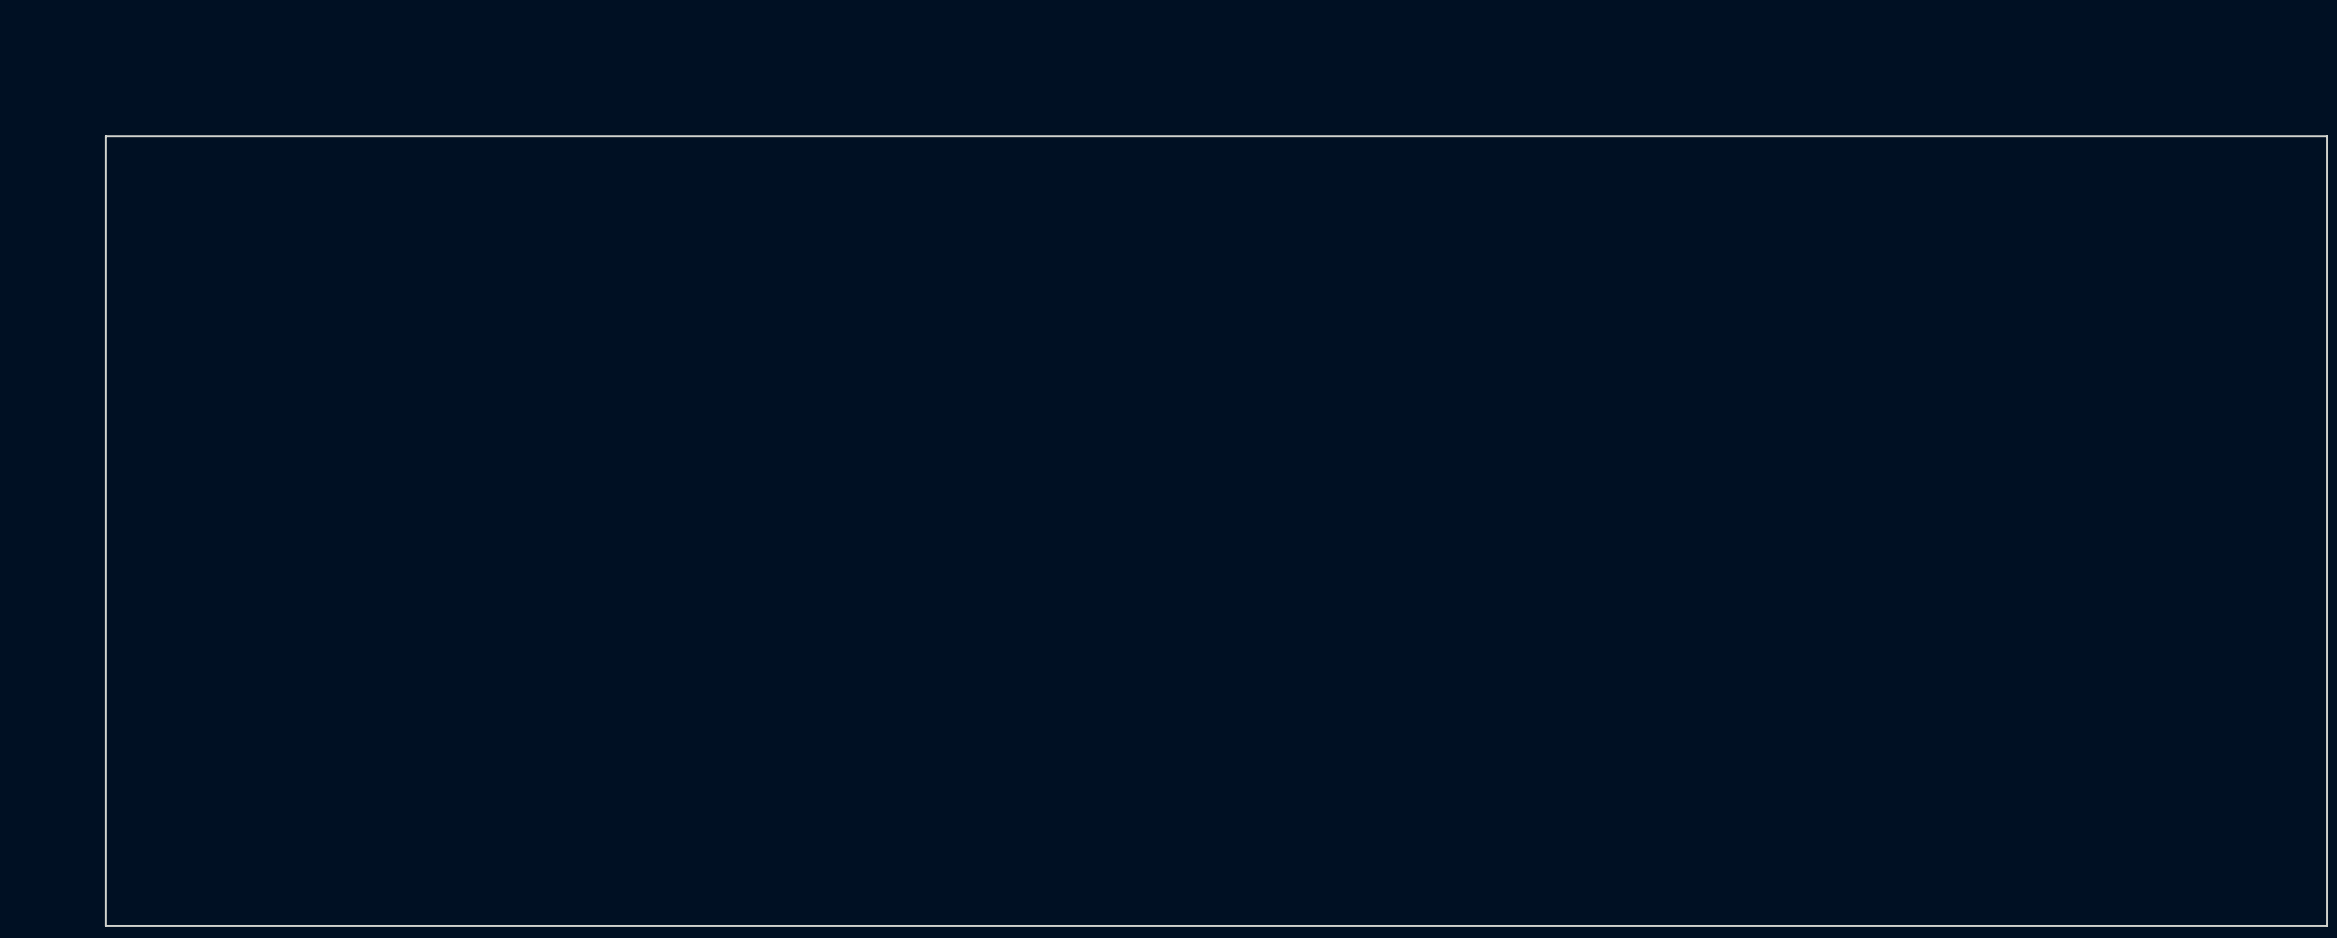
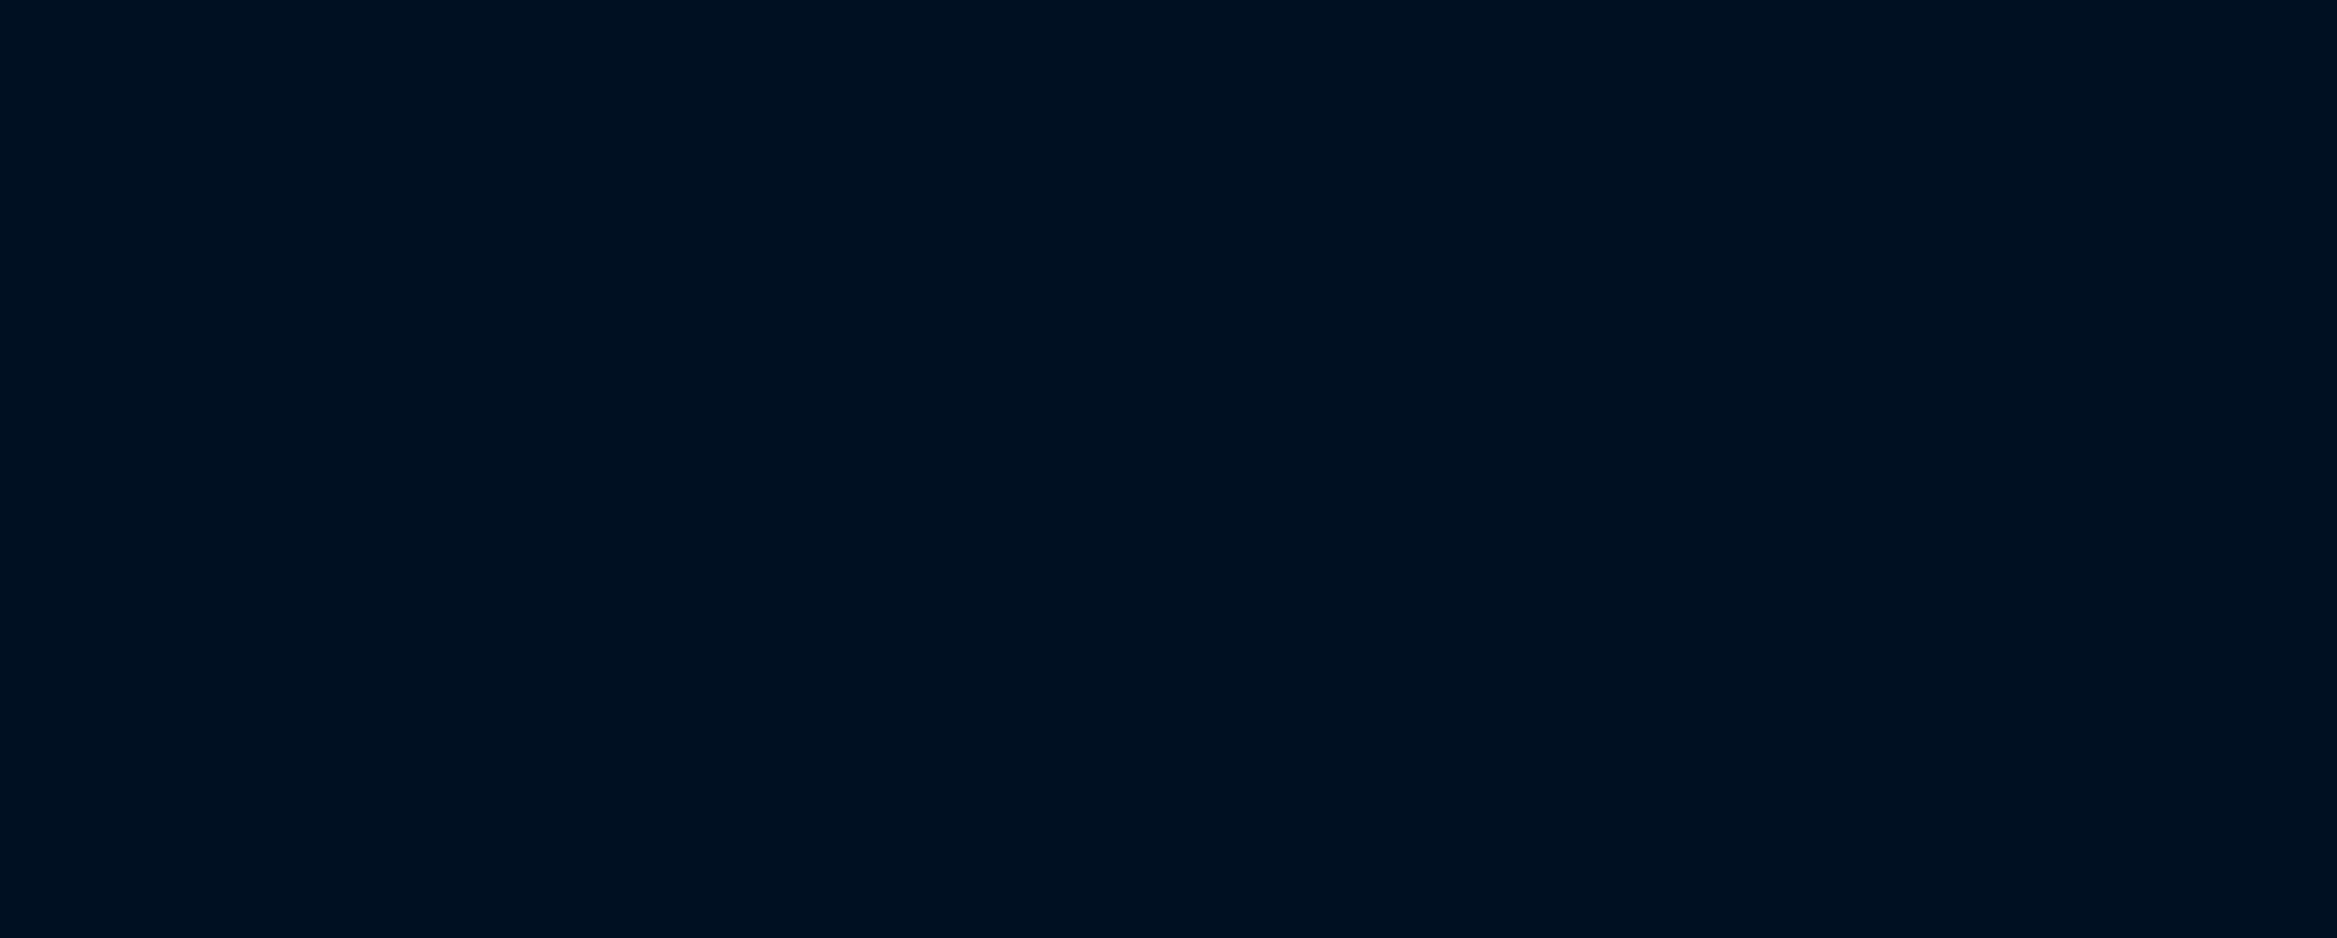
board edge: (2327, 136) (105, 136) (105, 925) (2327, 925) (2327, 136) -> none

